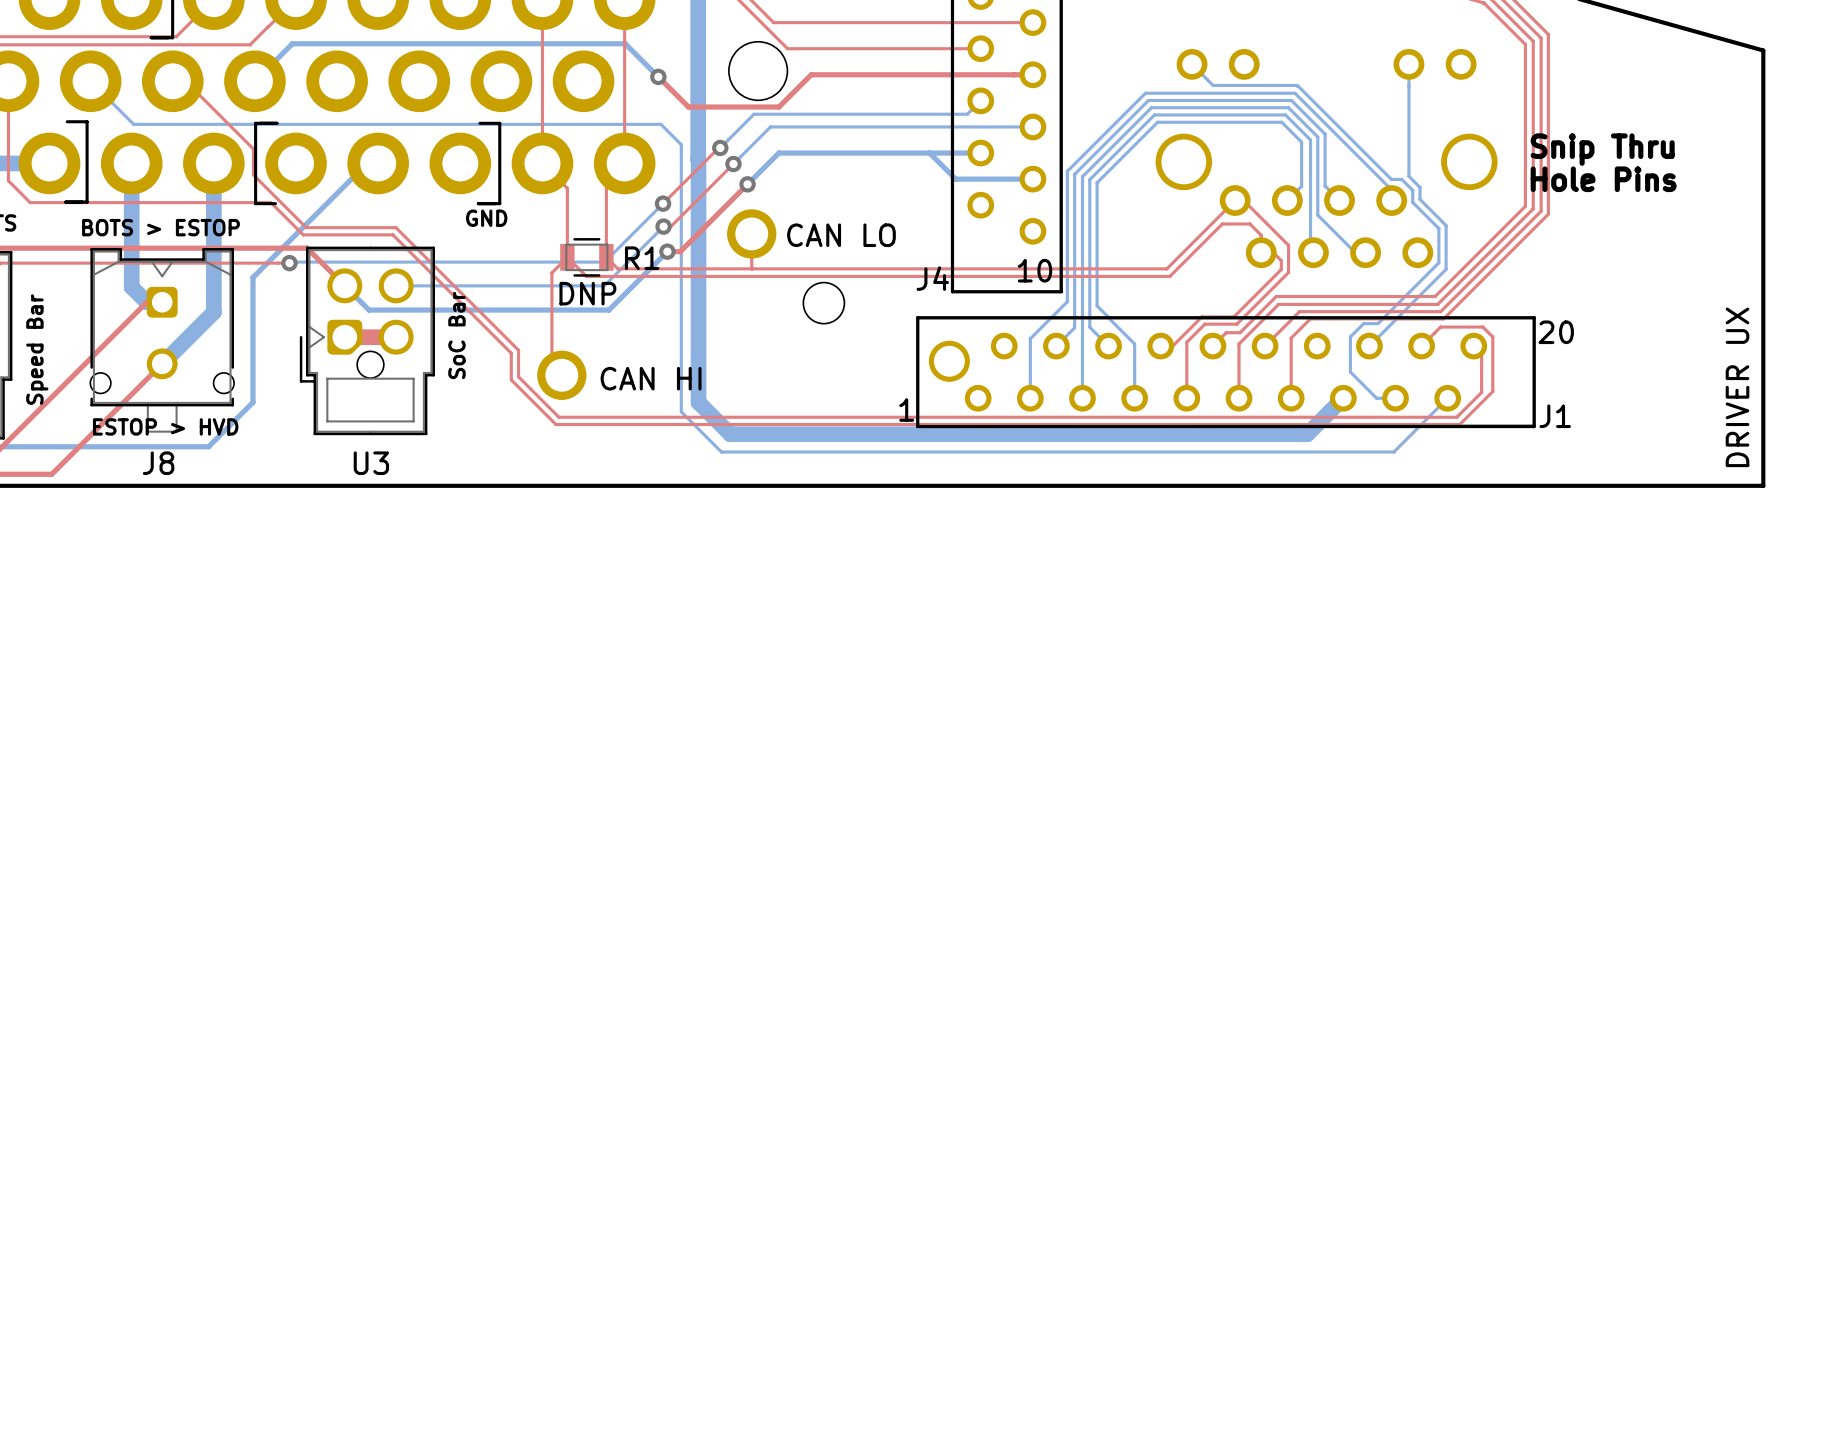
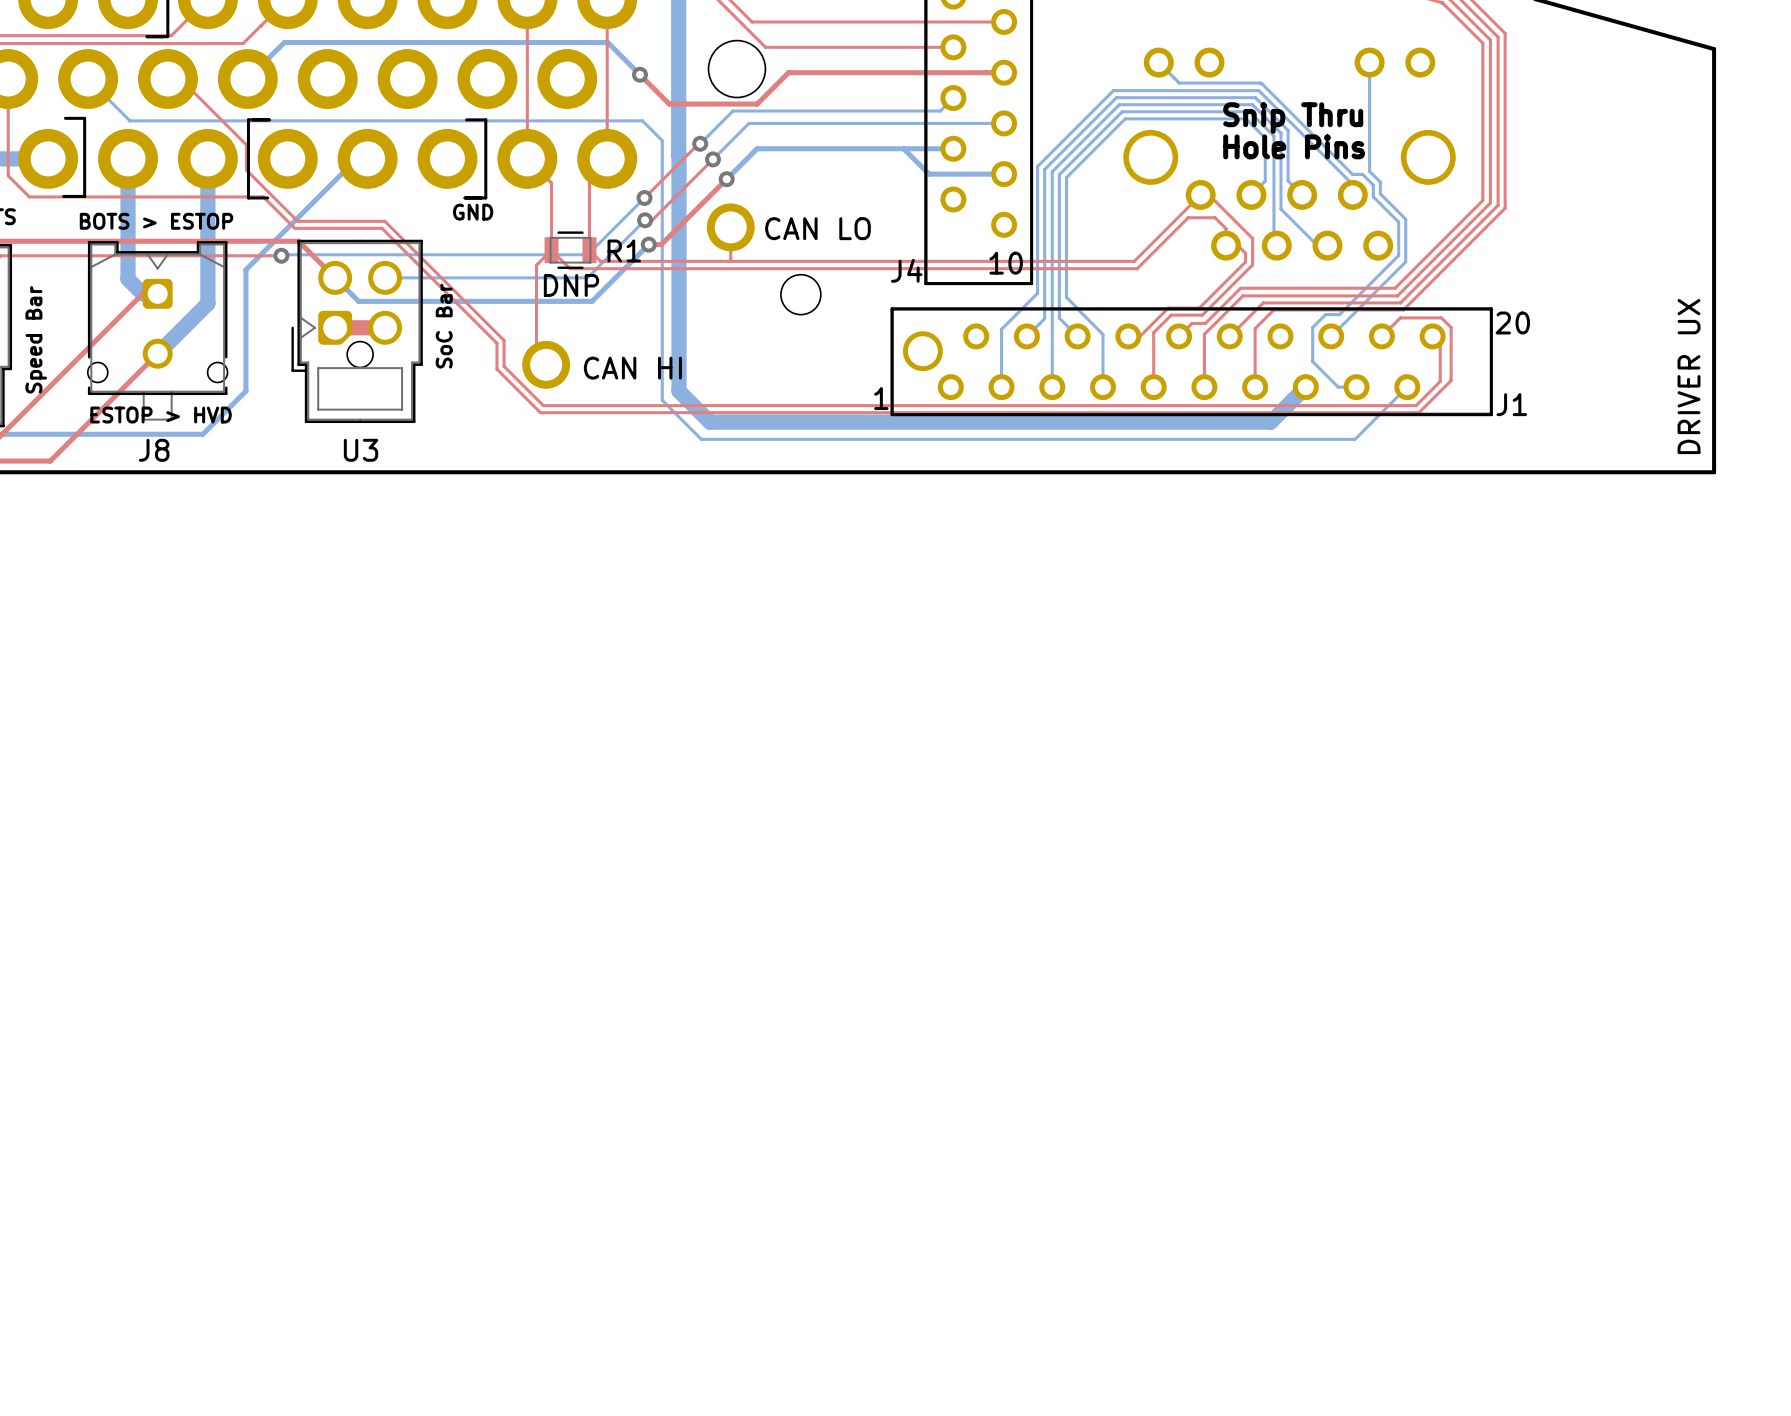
text position: Snip Thru (1602, 149) -> Snip Thru (1293, 118)
text position: Hole Pins (1603, 179) -> Hole Pins (1294, 146)

